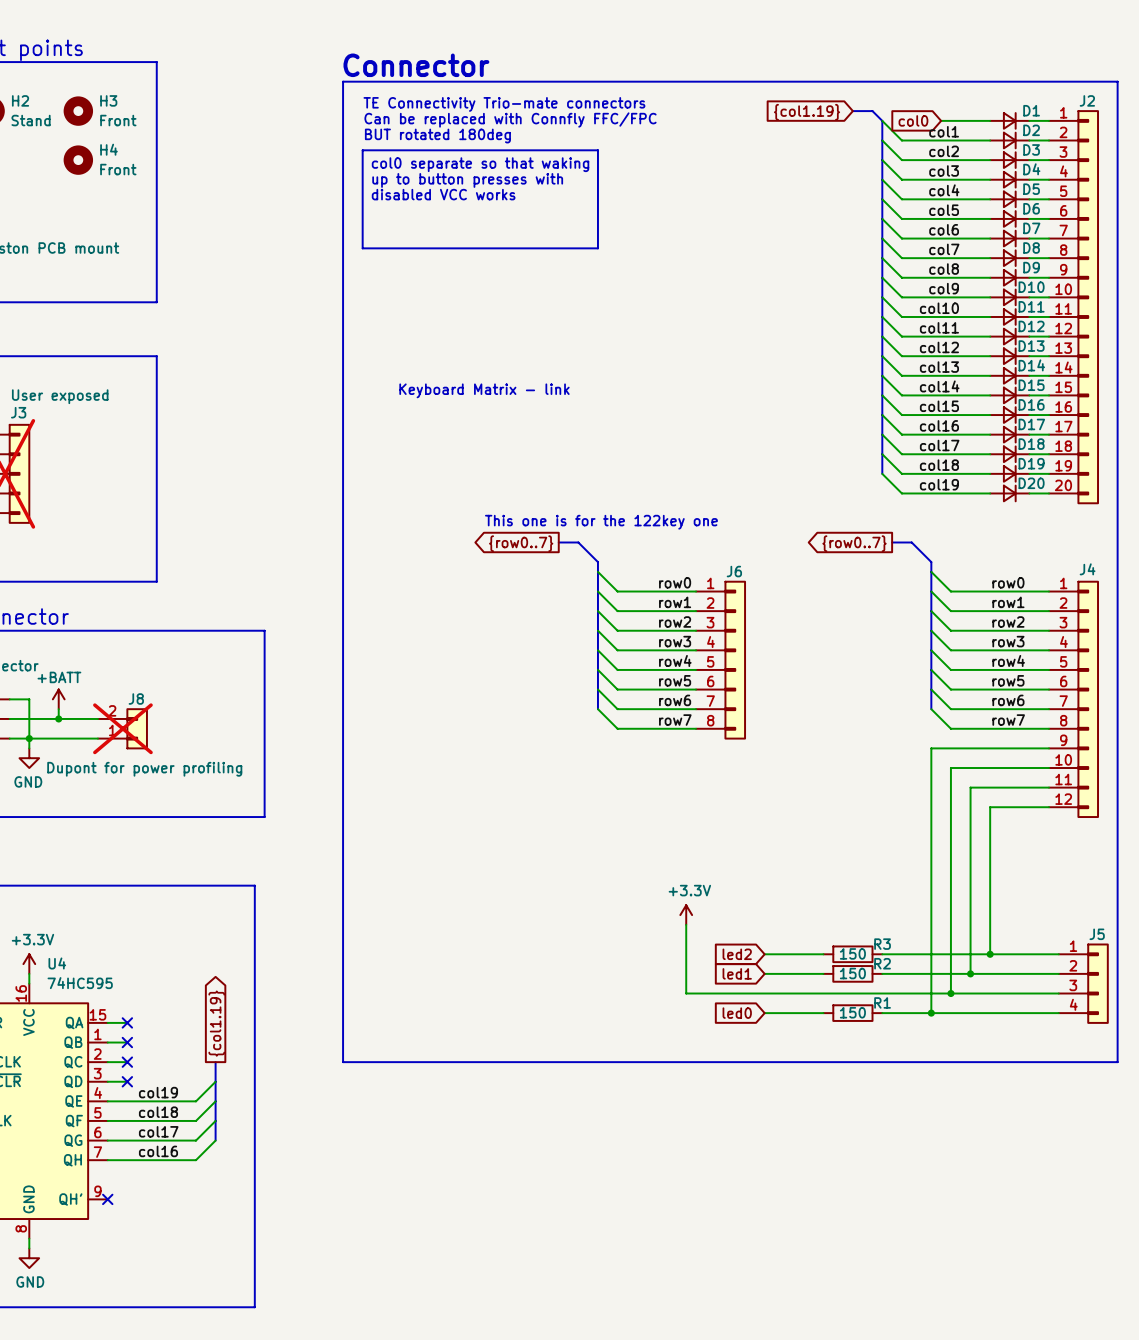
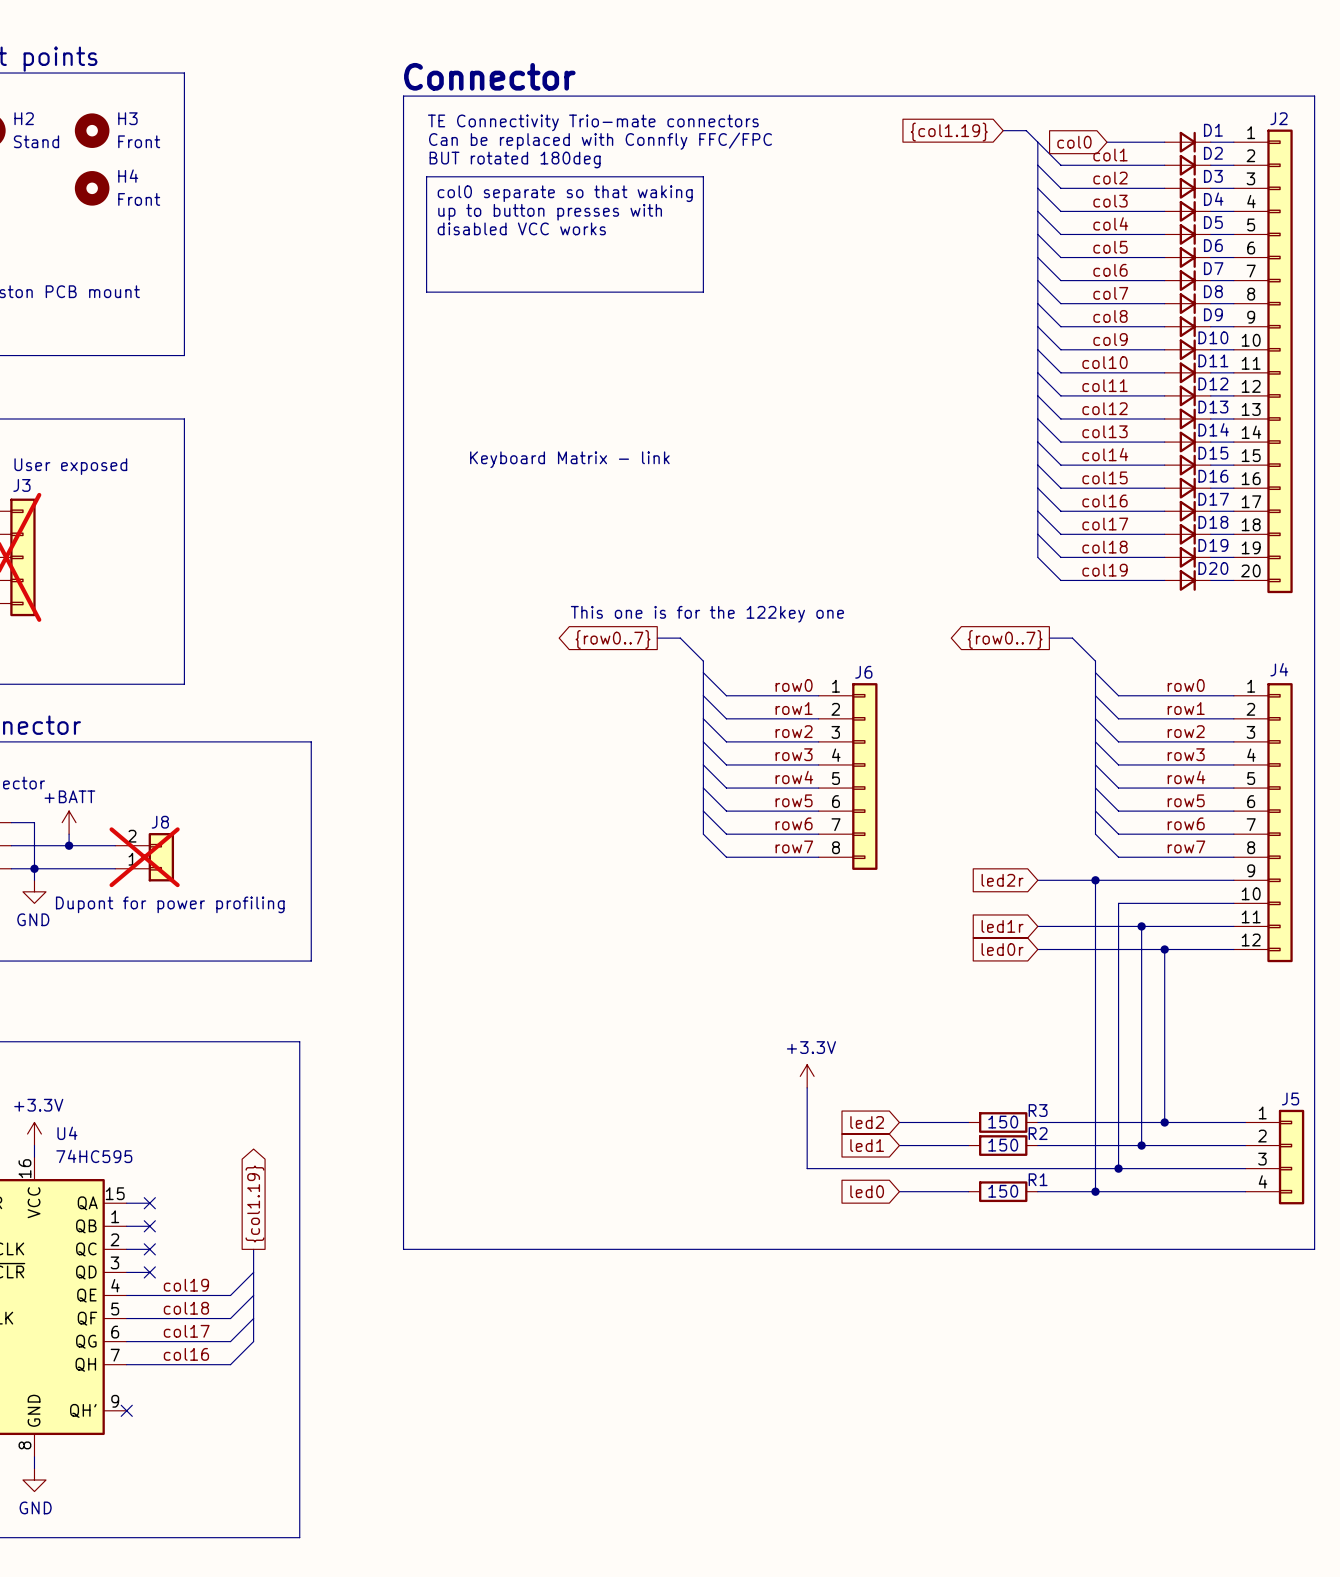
global label: none -> led2r (1002, 880)
wire: none -> (1037, 880) (1095, 880)
junction: none -> (1095, 880)
global label: none -> led1r (1002, 926)
wire: none -> (1037, 926) (1141, 926)
junction: none -> (1141, 926)
global label: none -> led0r (1002, 949)
wire: none -> (1037, 949) (1164, 949)
junction: none -> (1164, 949)

